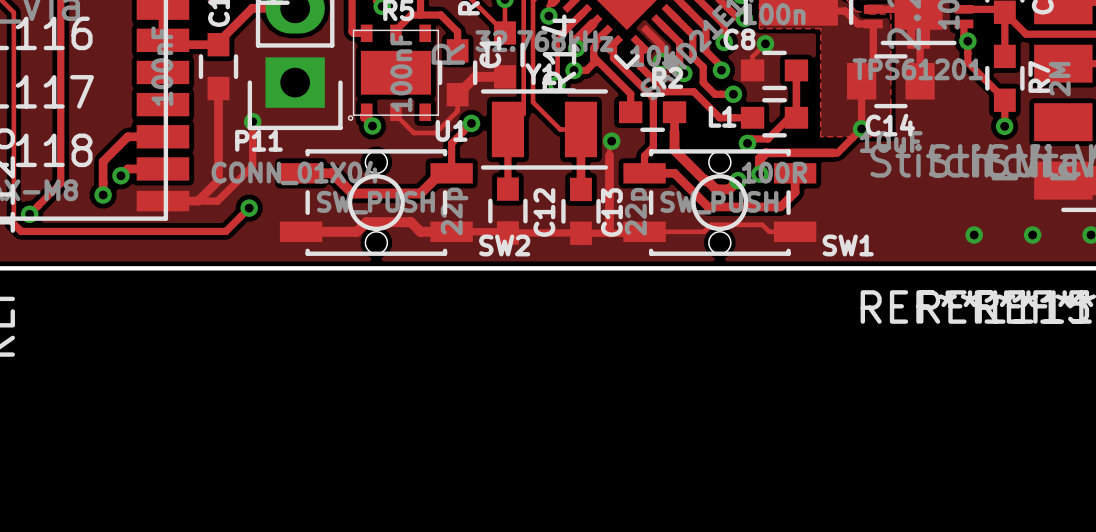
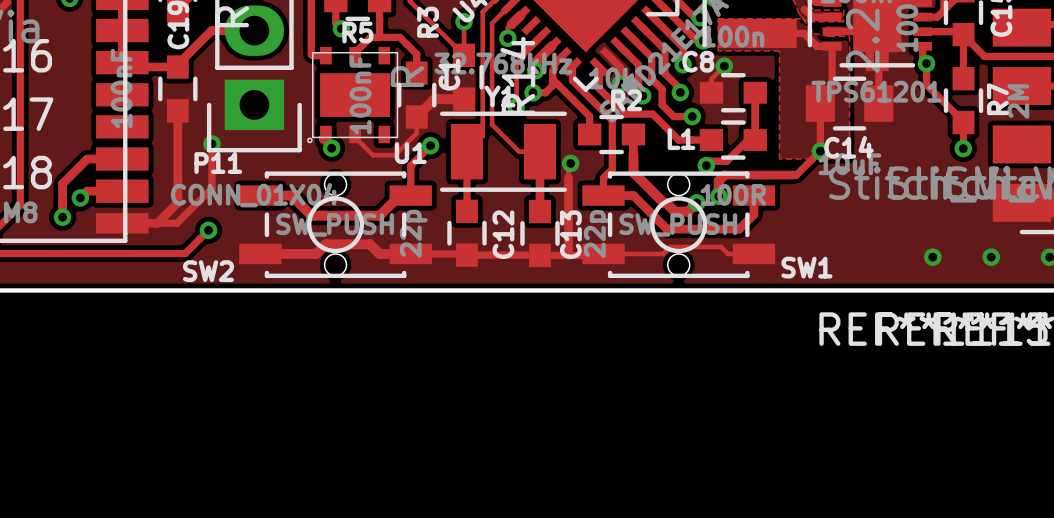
SW2 name position: SW2 (504, 245) -> SW2 (208, 271)

